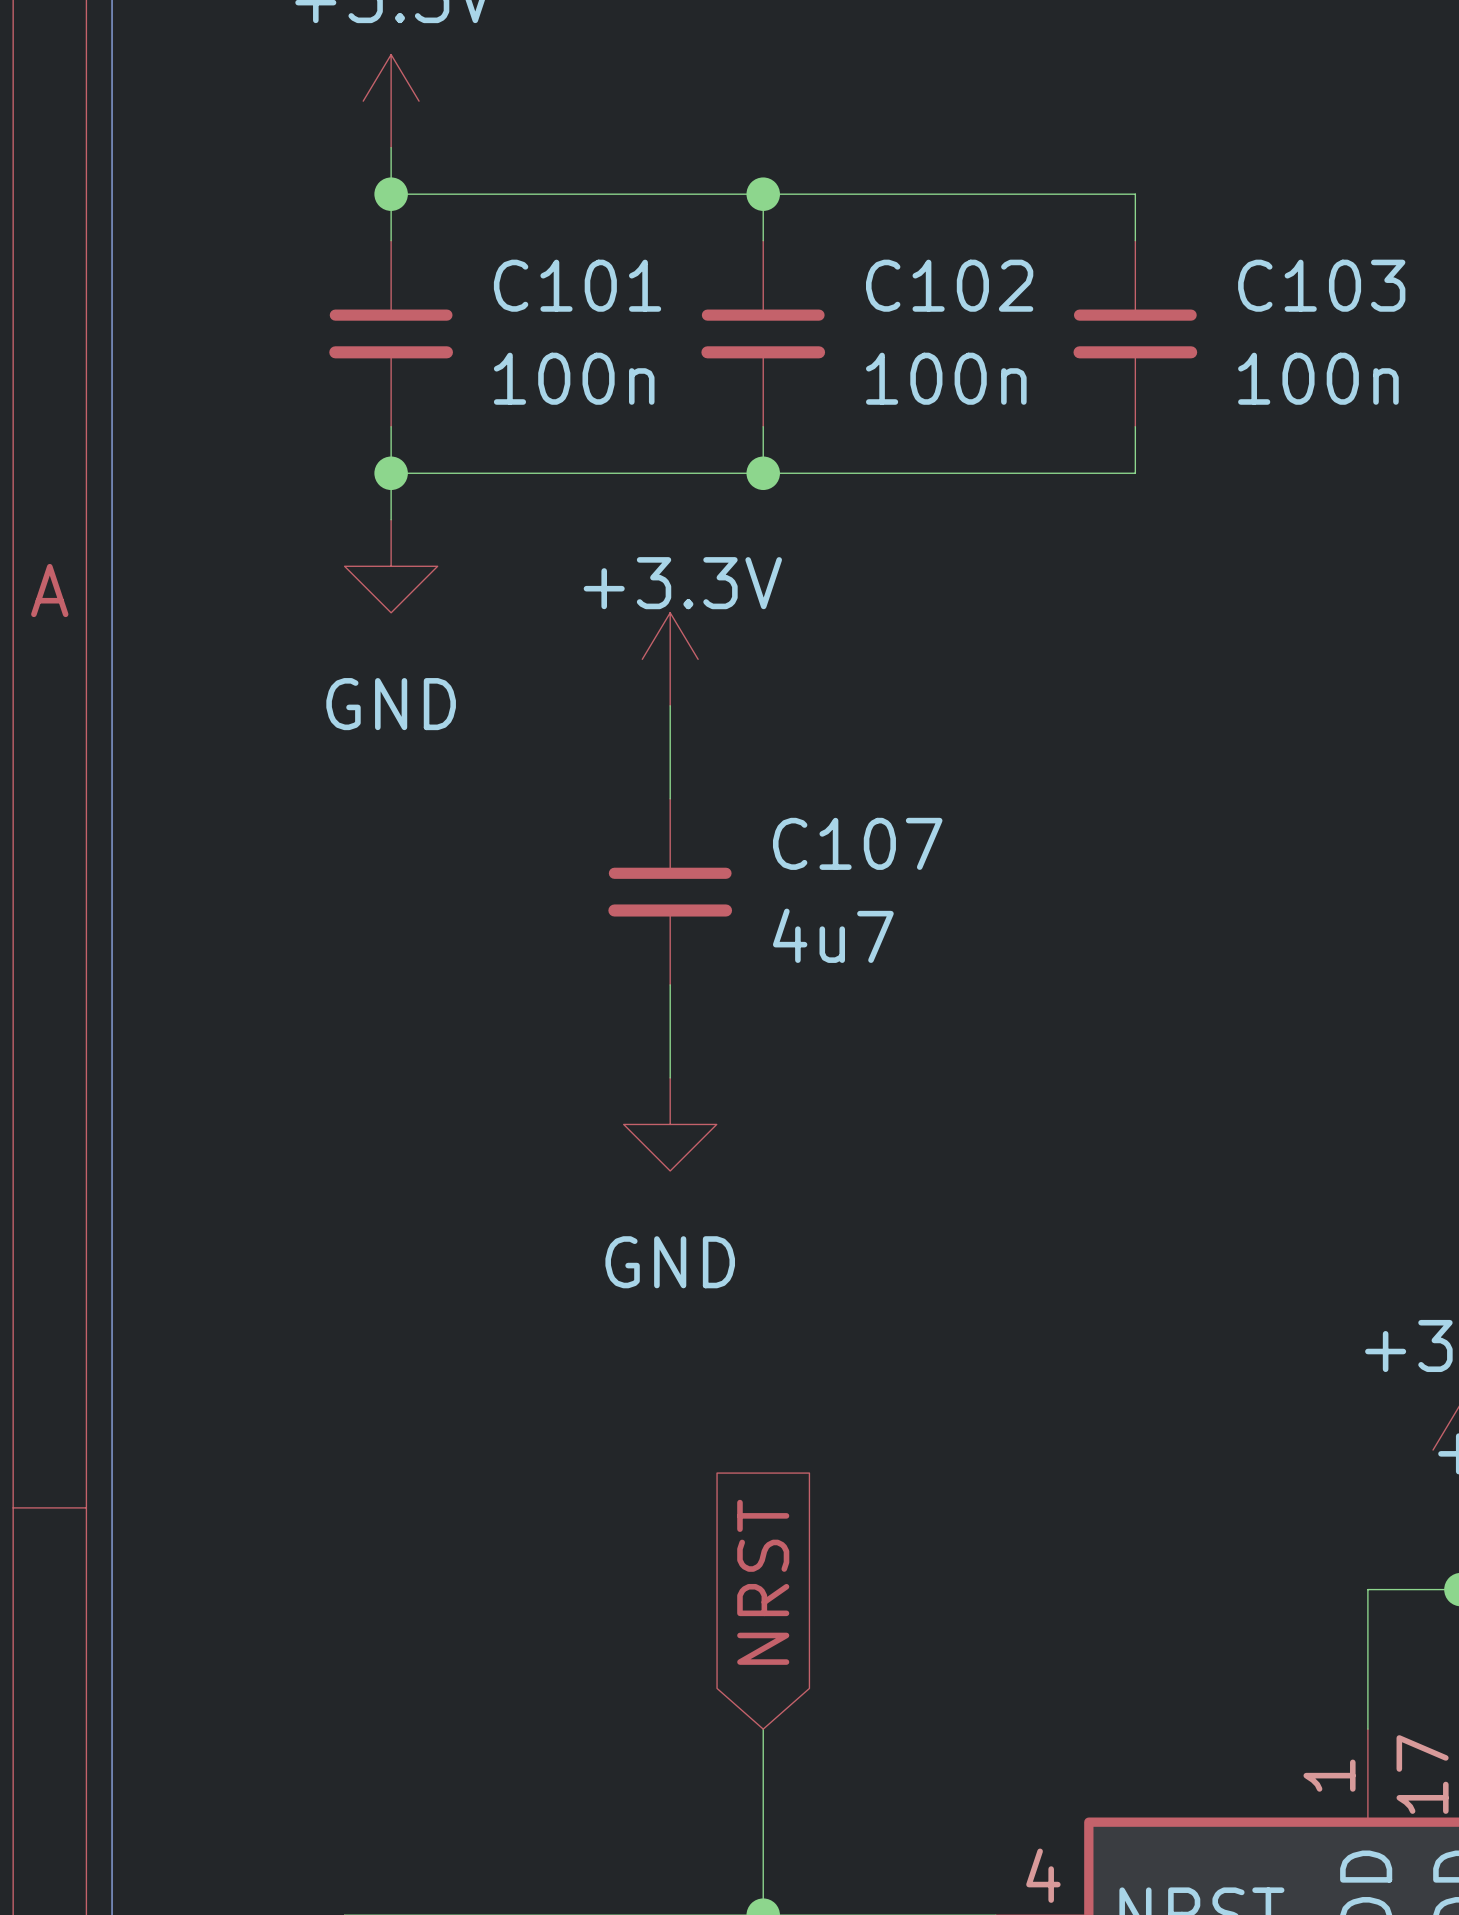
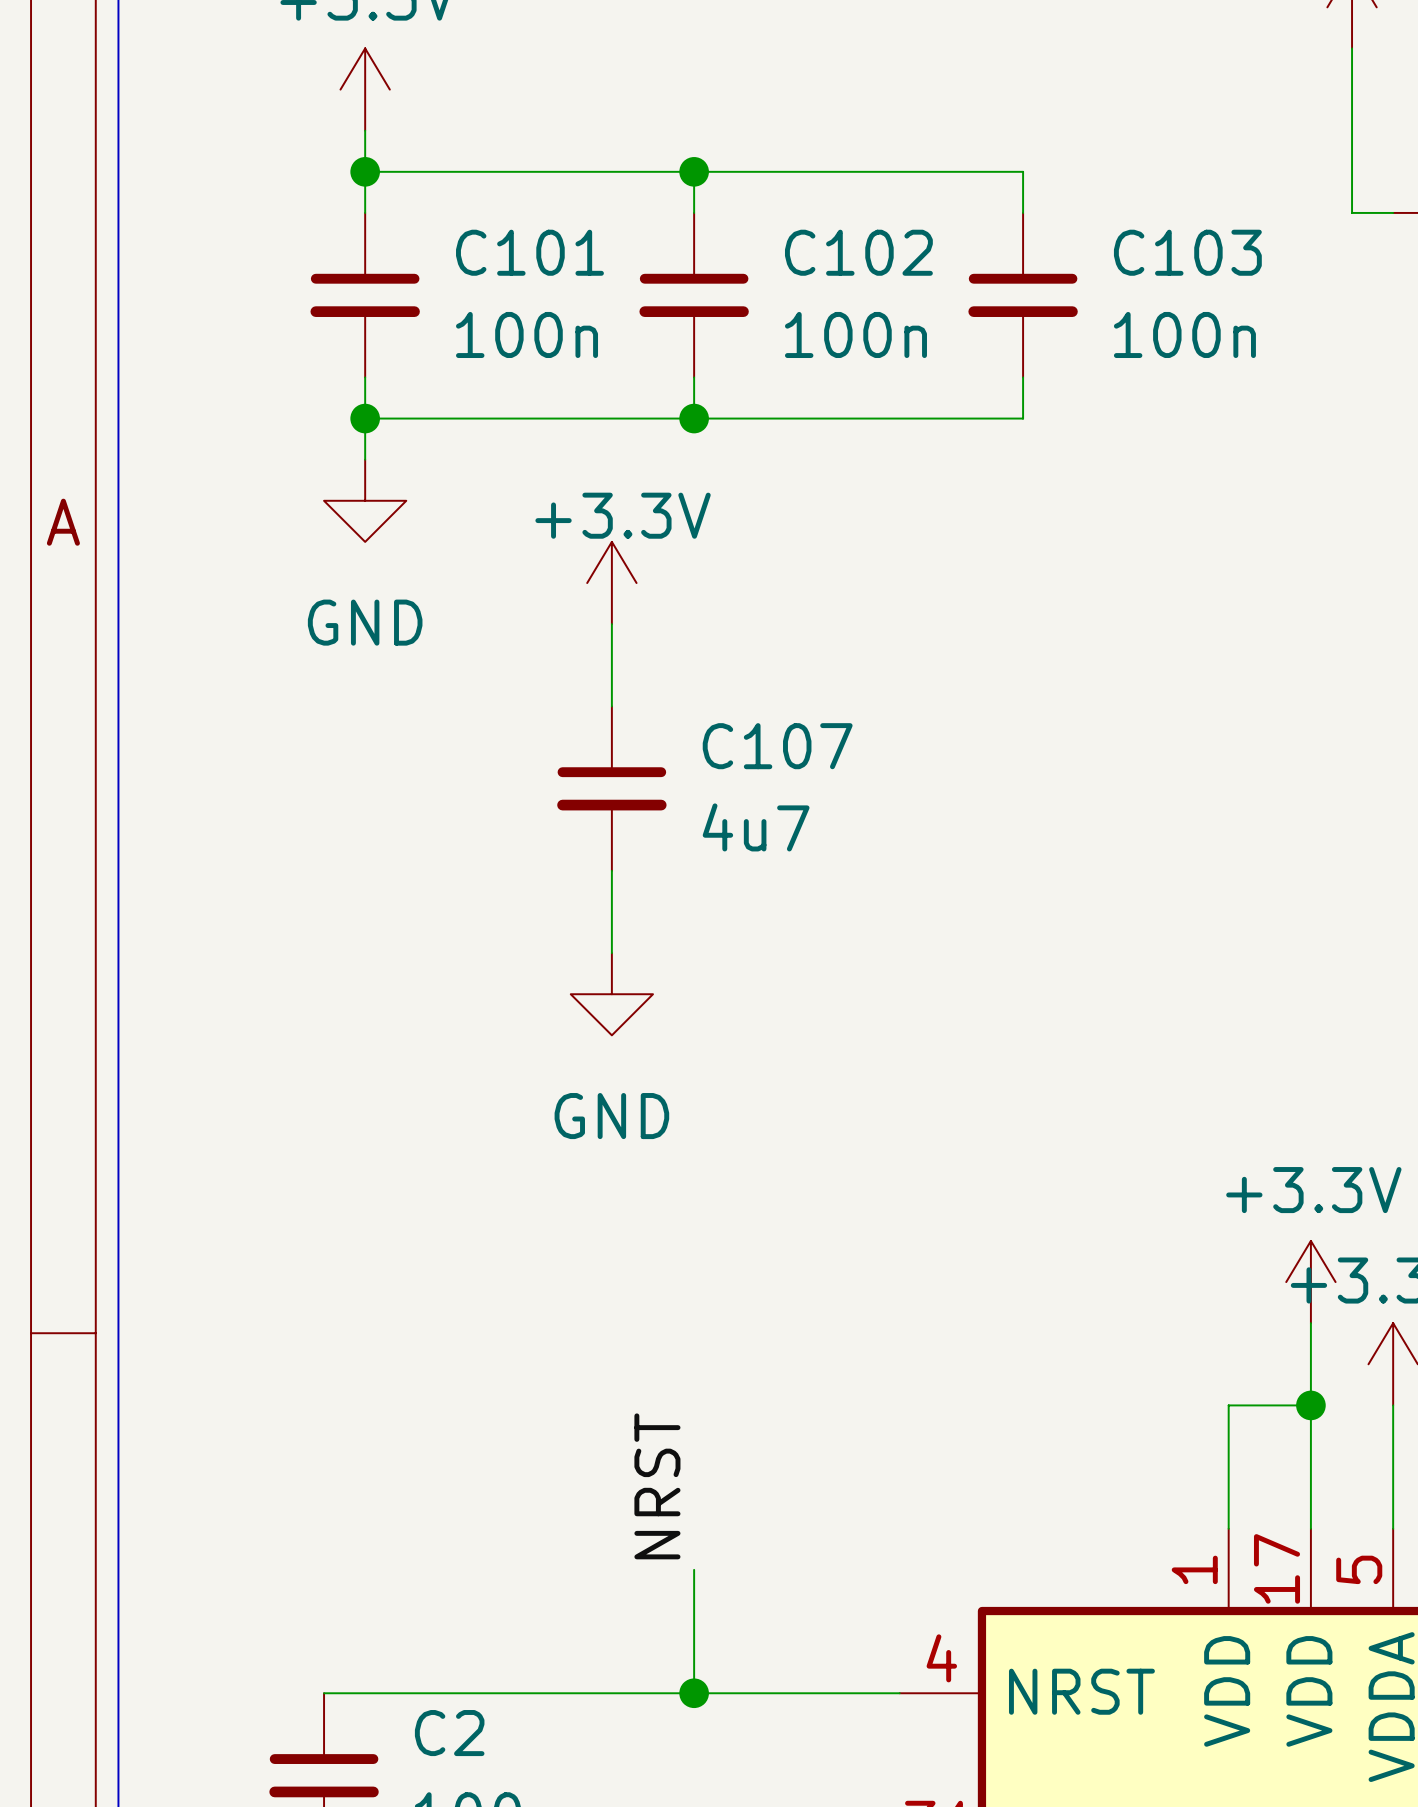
global label: NRST (763, 1582) -> none
label: none -> NRST (657, 1486)
wire: (763, 1729) (763, 1775) -> none

